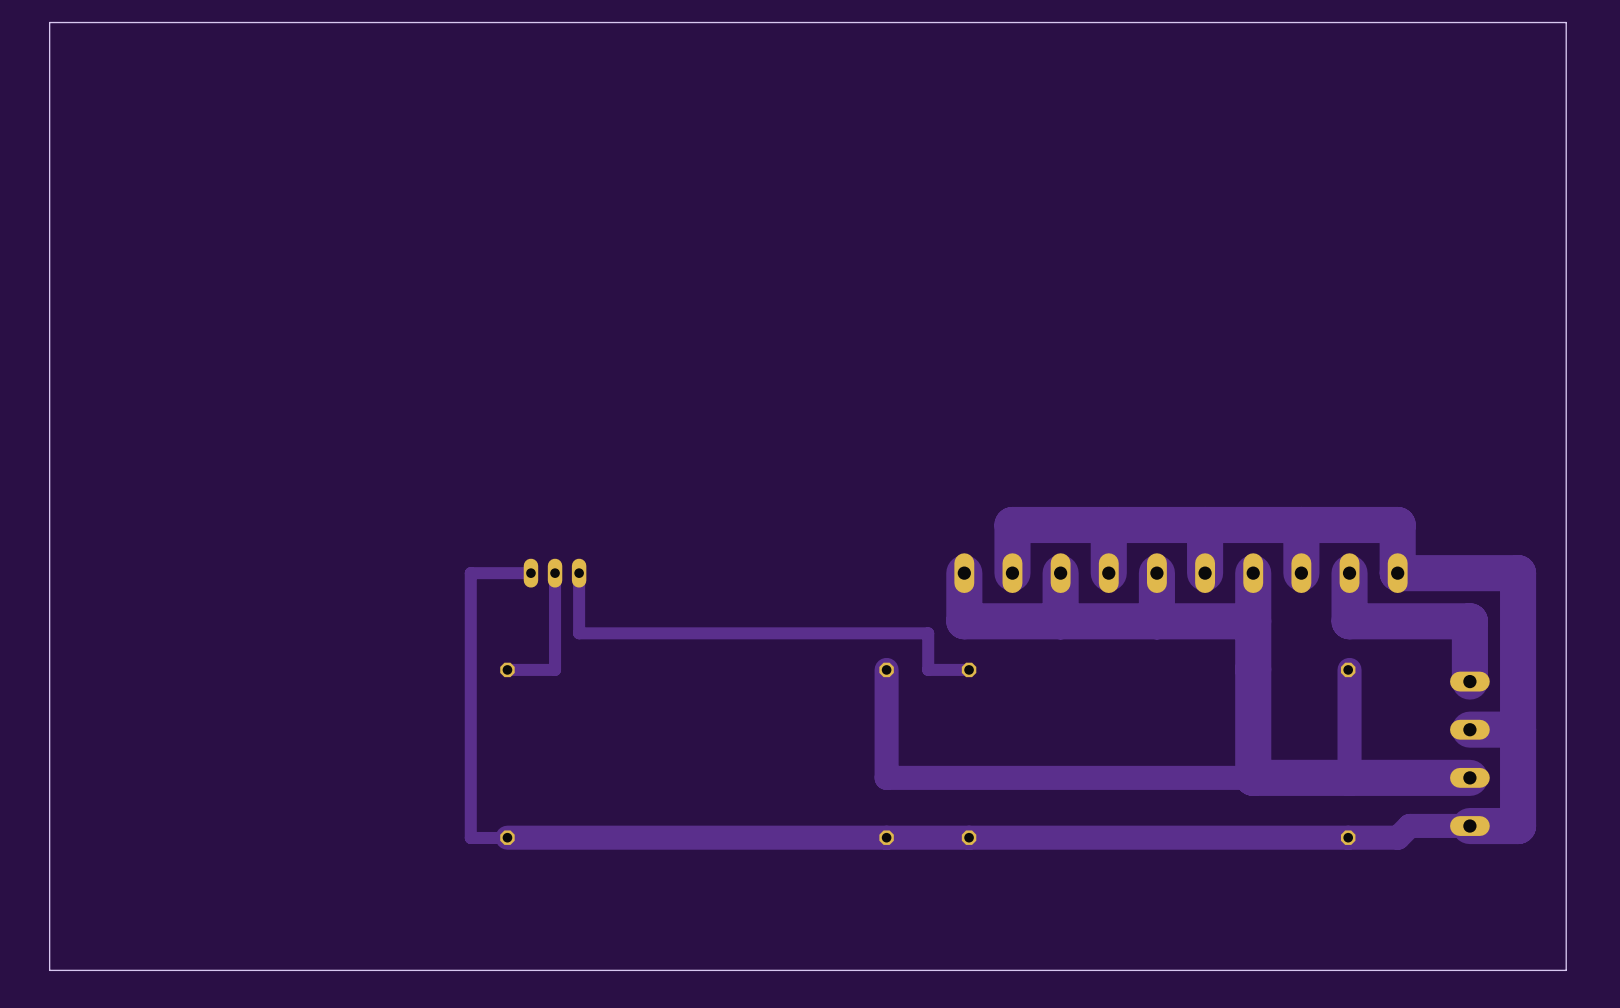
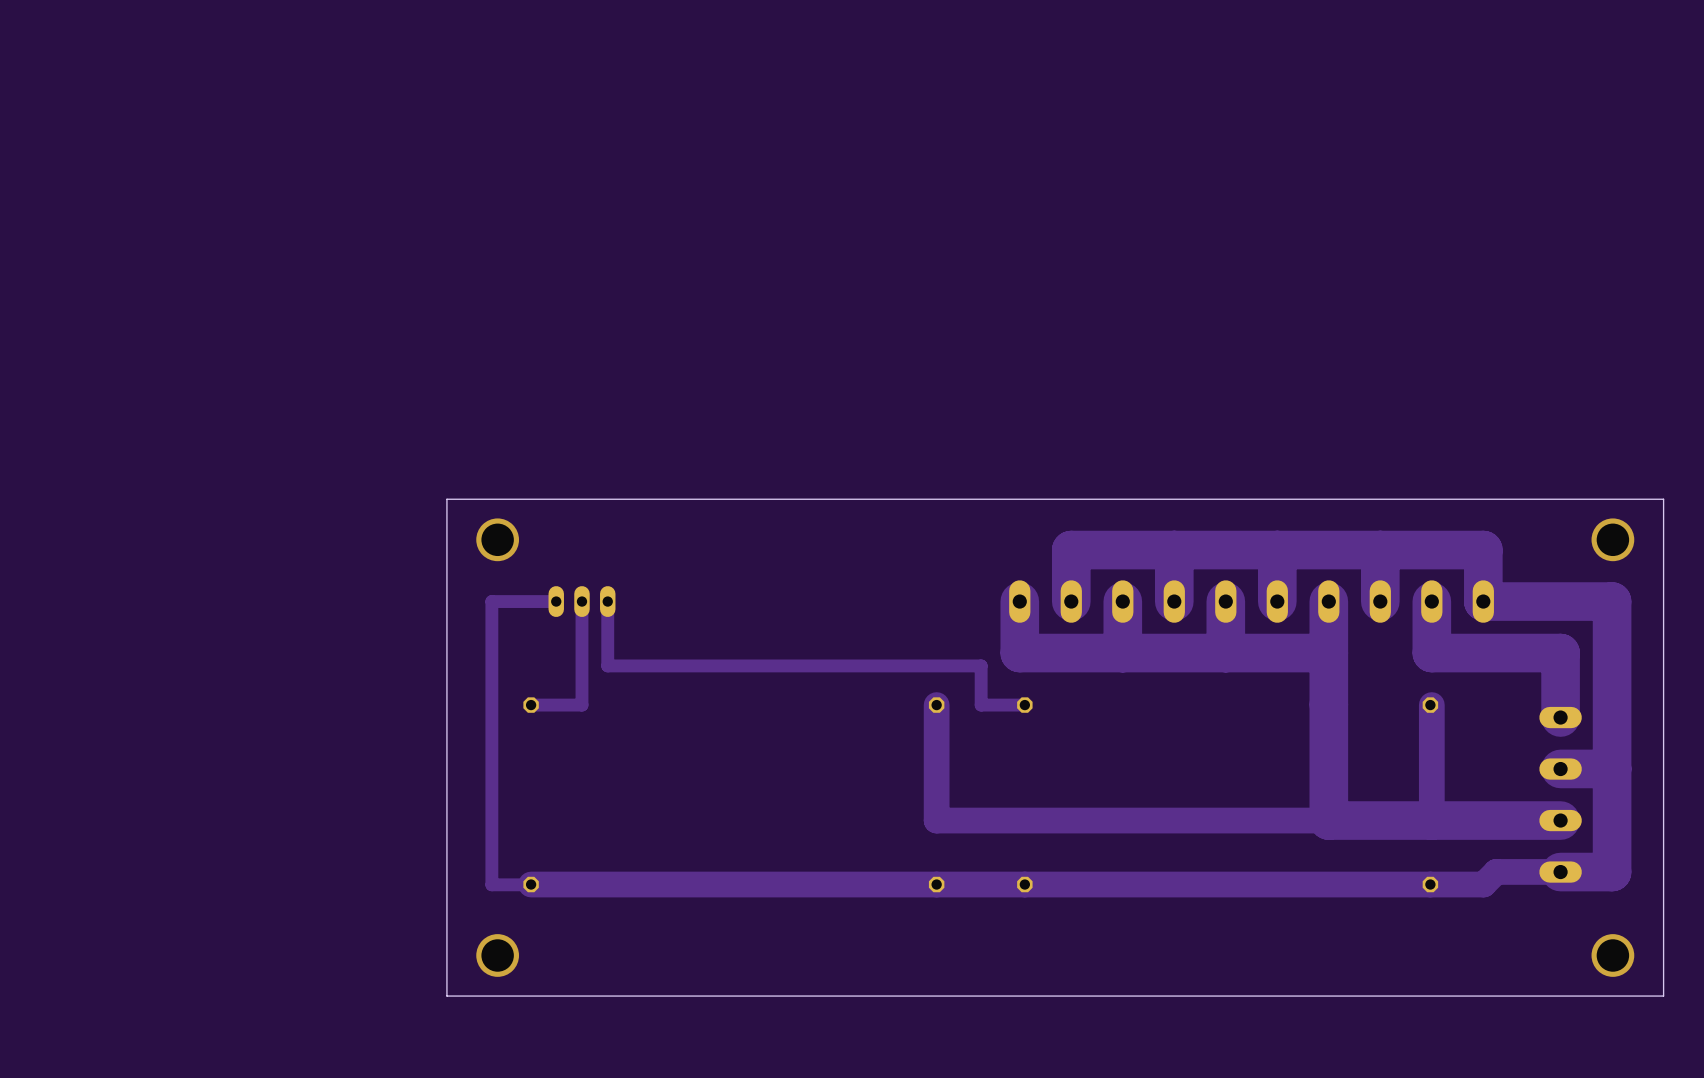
board edge: (1566, 477) (1566, 22) (49, 22) (49, 970) (1566, 970) (1566, 941) -> (1663, 499) (446, 499) (446, 996) (1663, 996)
via: none -> (497, 539)
via: none -> (1612, 539)
via: none -> (497, 955)
via: none -> (1612, 955)

